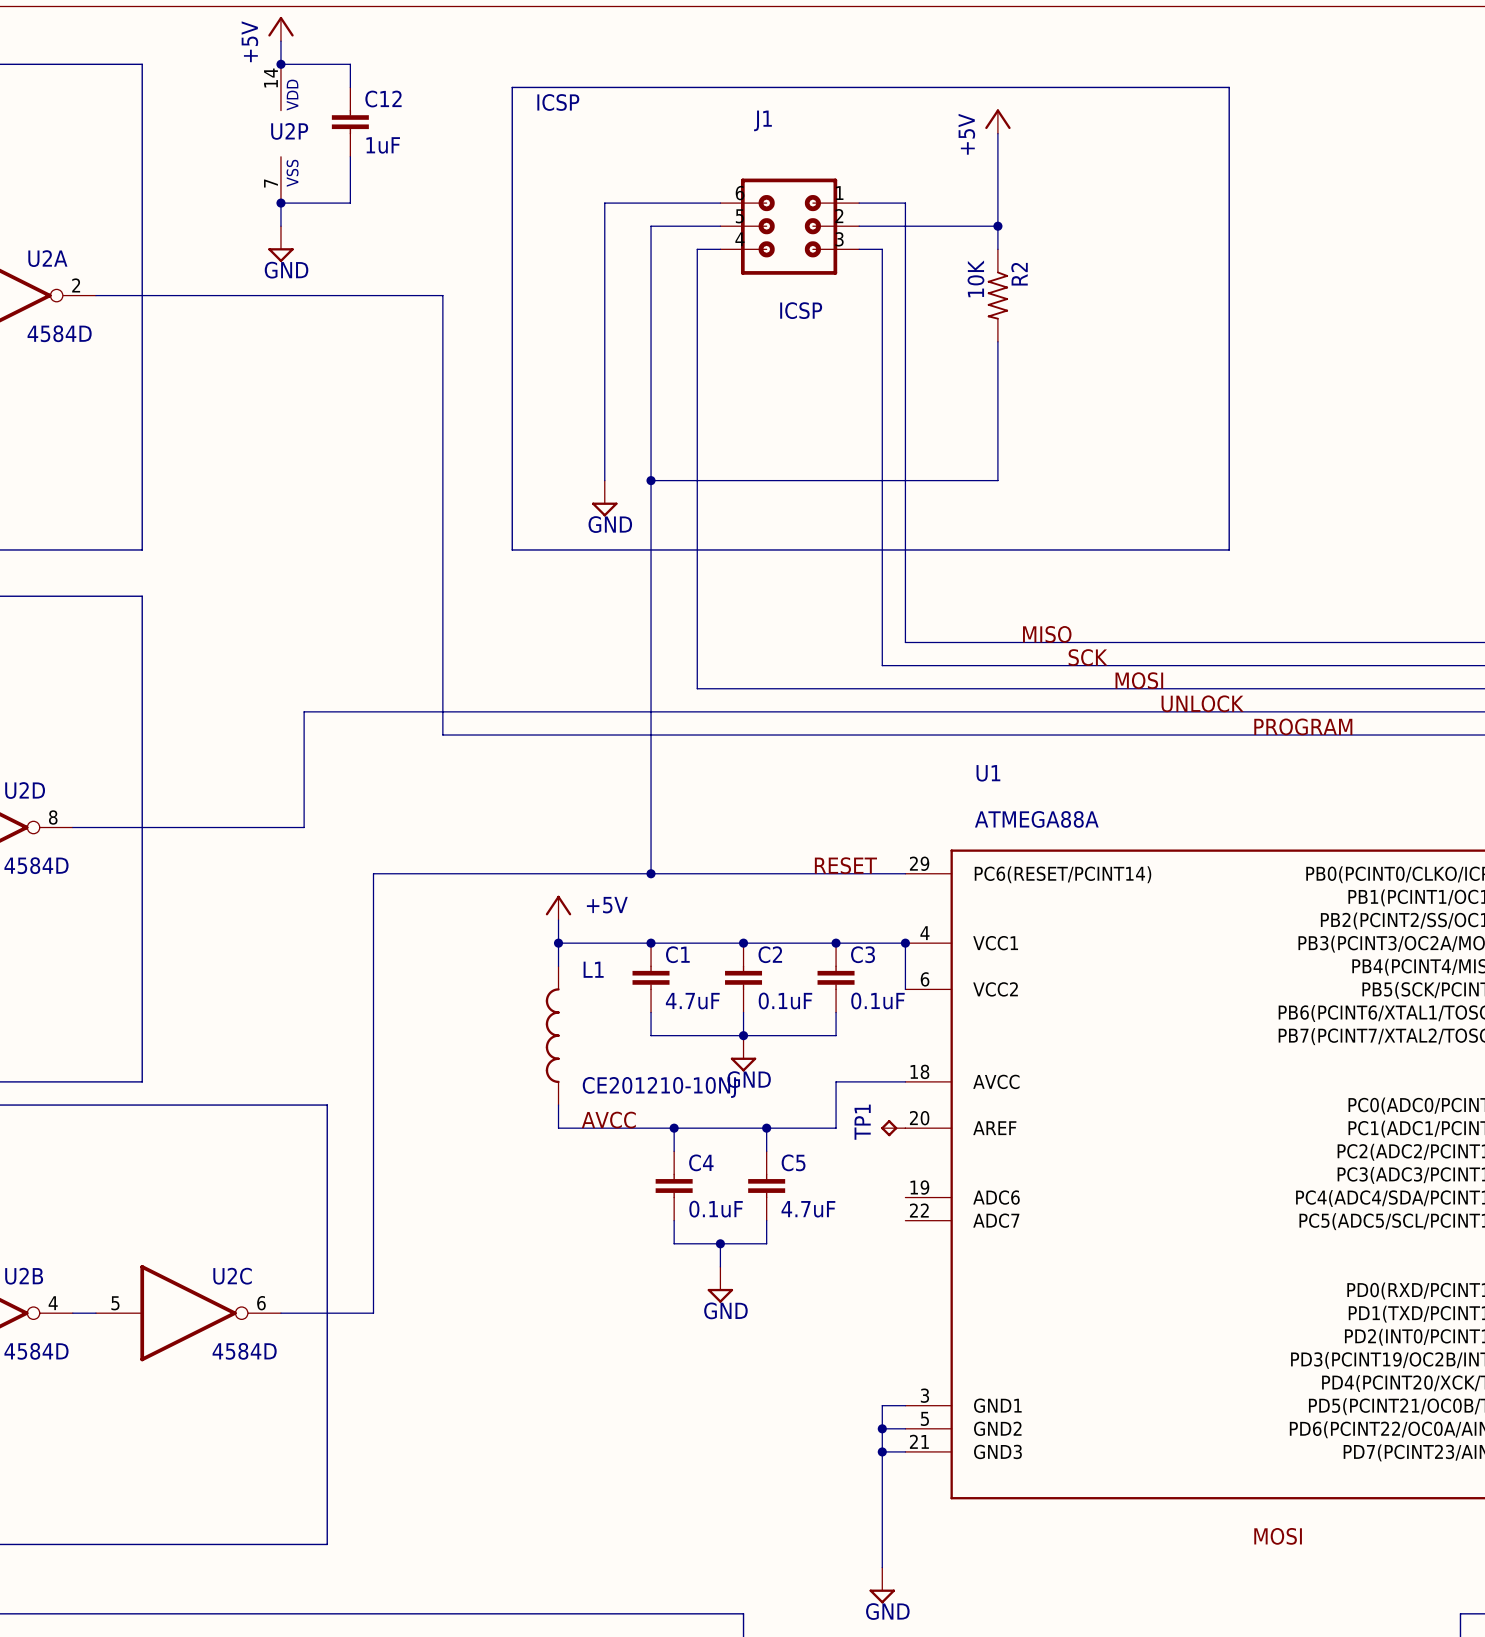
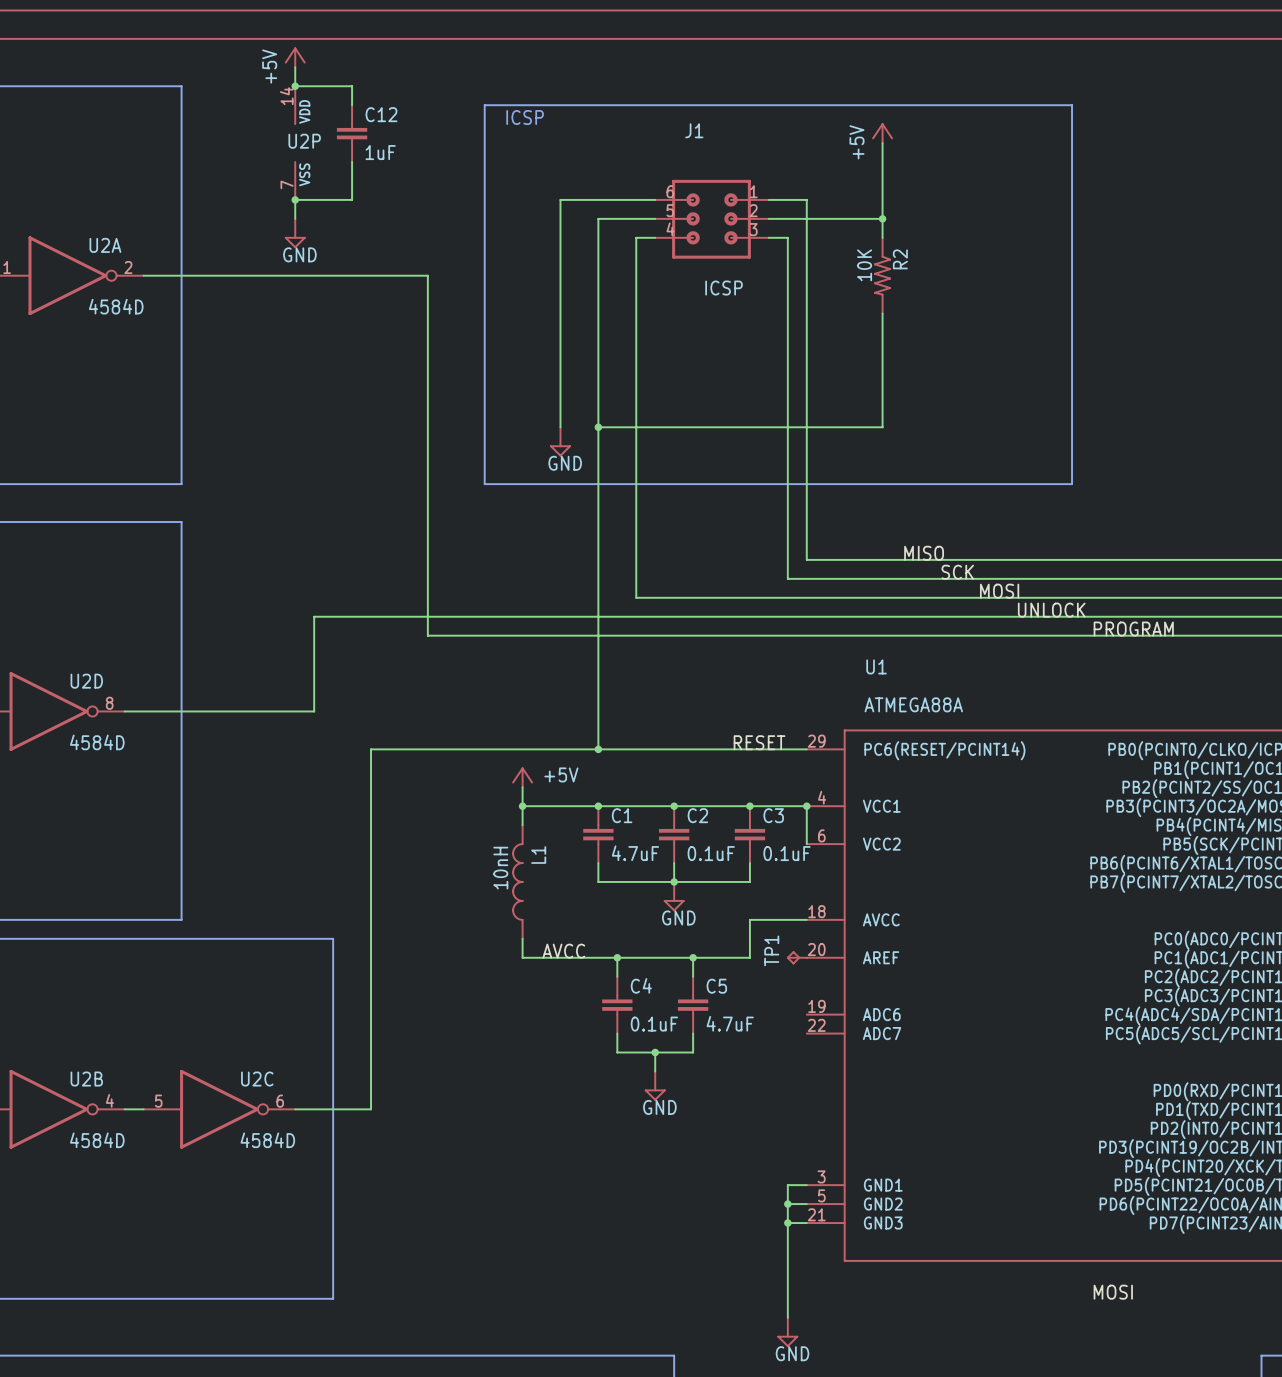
L1 name rotation: 0° (593, 969) -> 90° counterclockwise (538, 855)
L1 name position: L1 (593, 969) -> L1 (538, 855)
L1 value: CE201210-10NJ (659, 1087) -> 10nH (500, 868)

